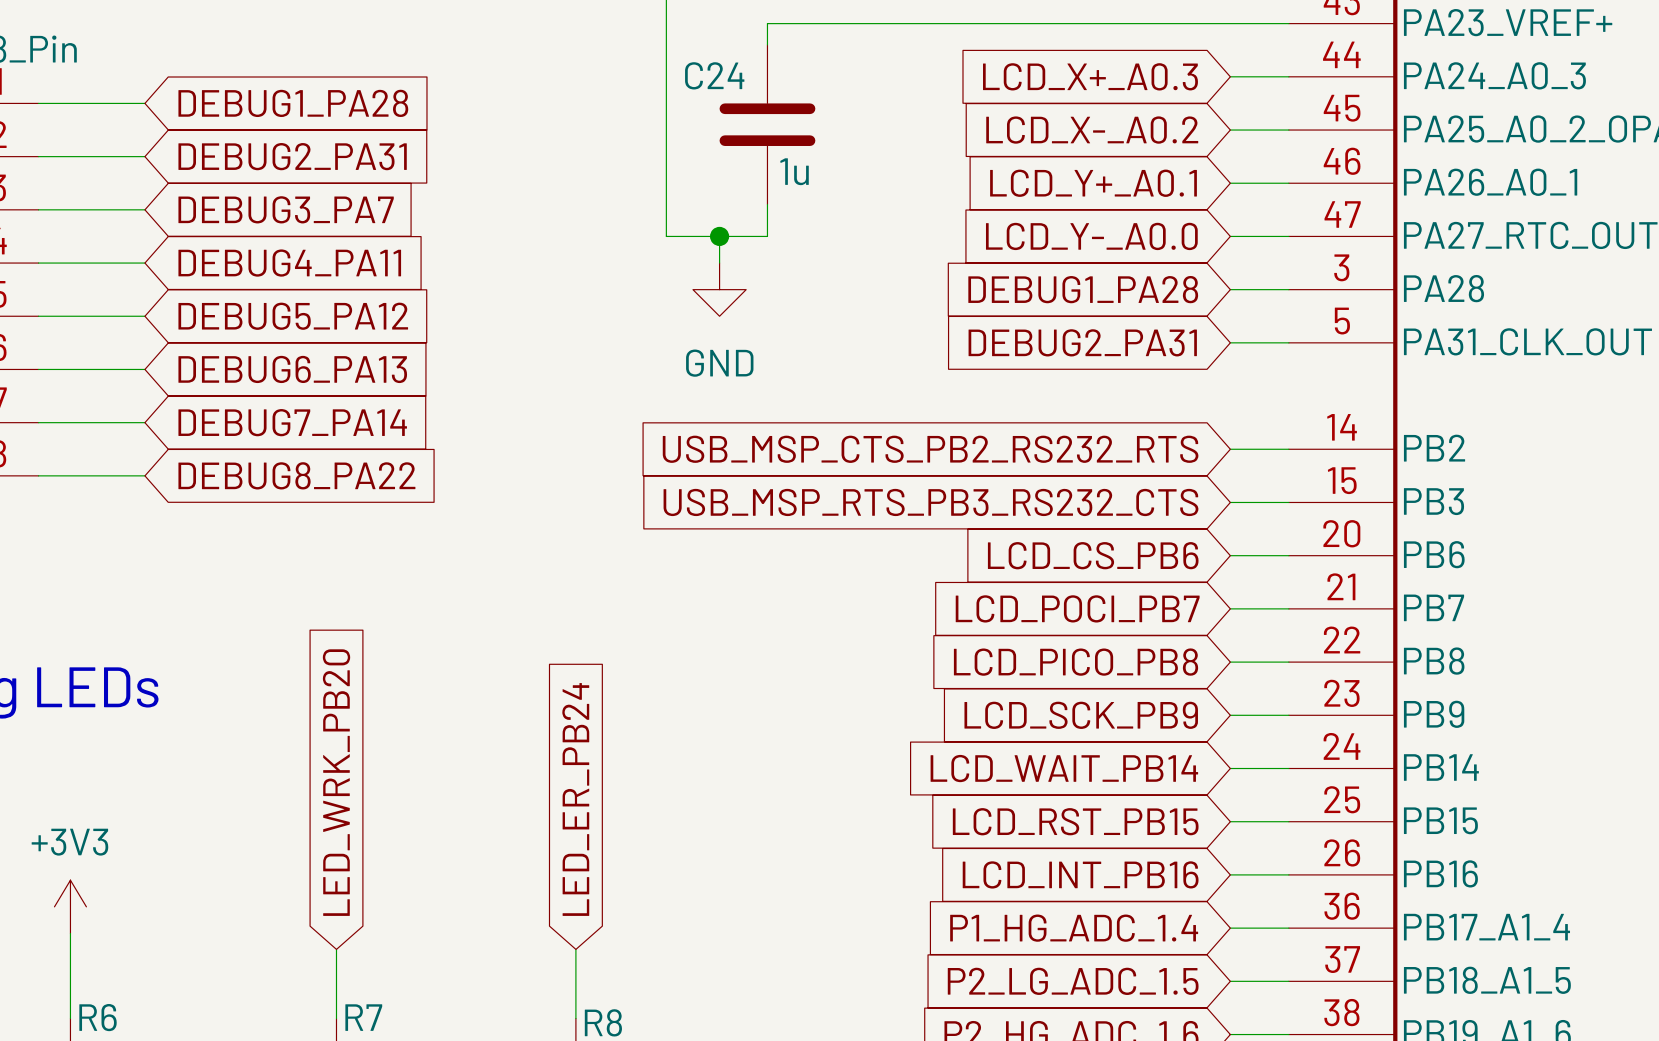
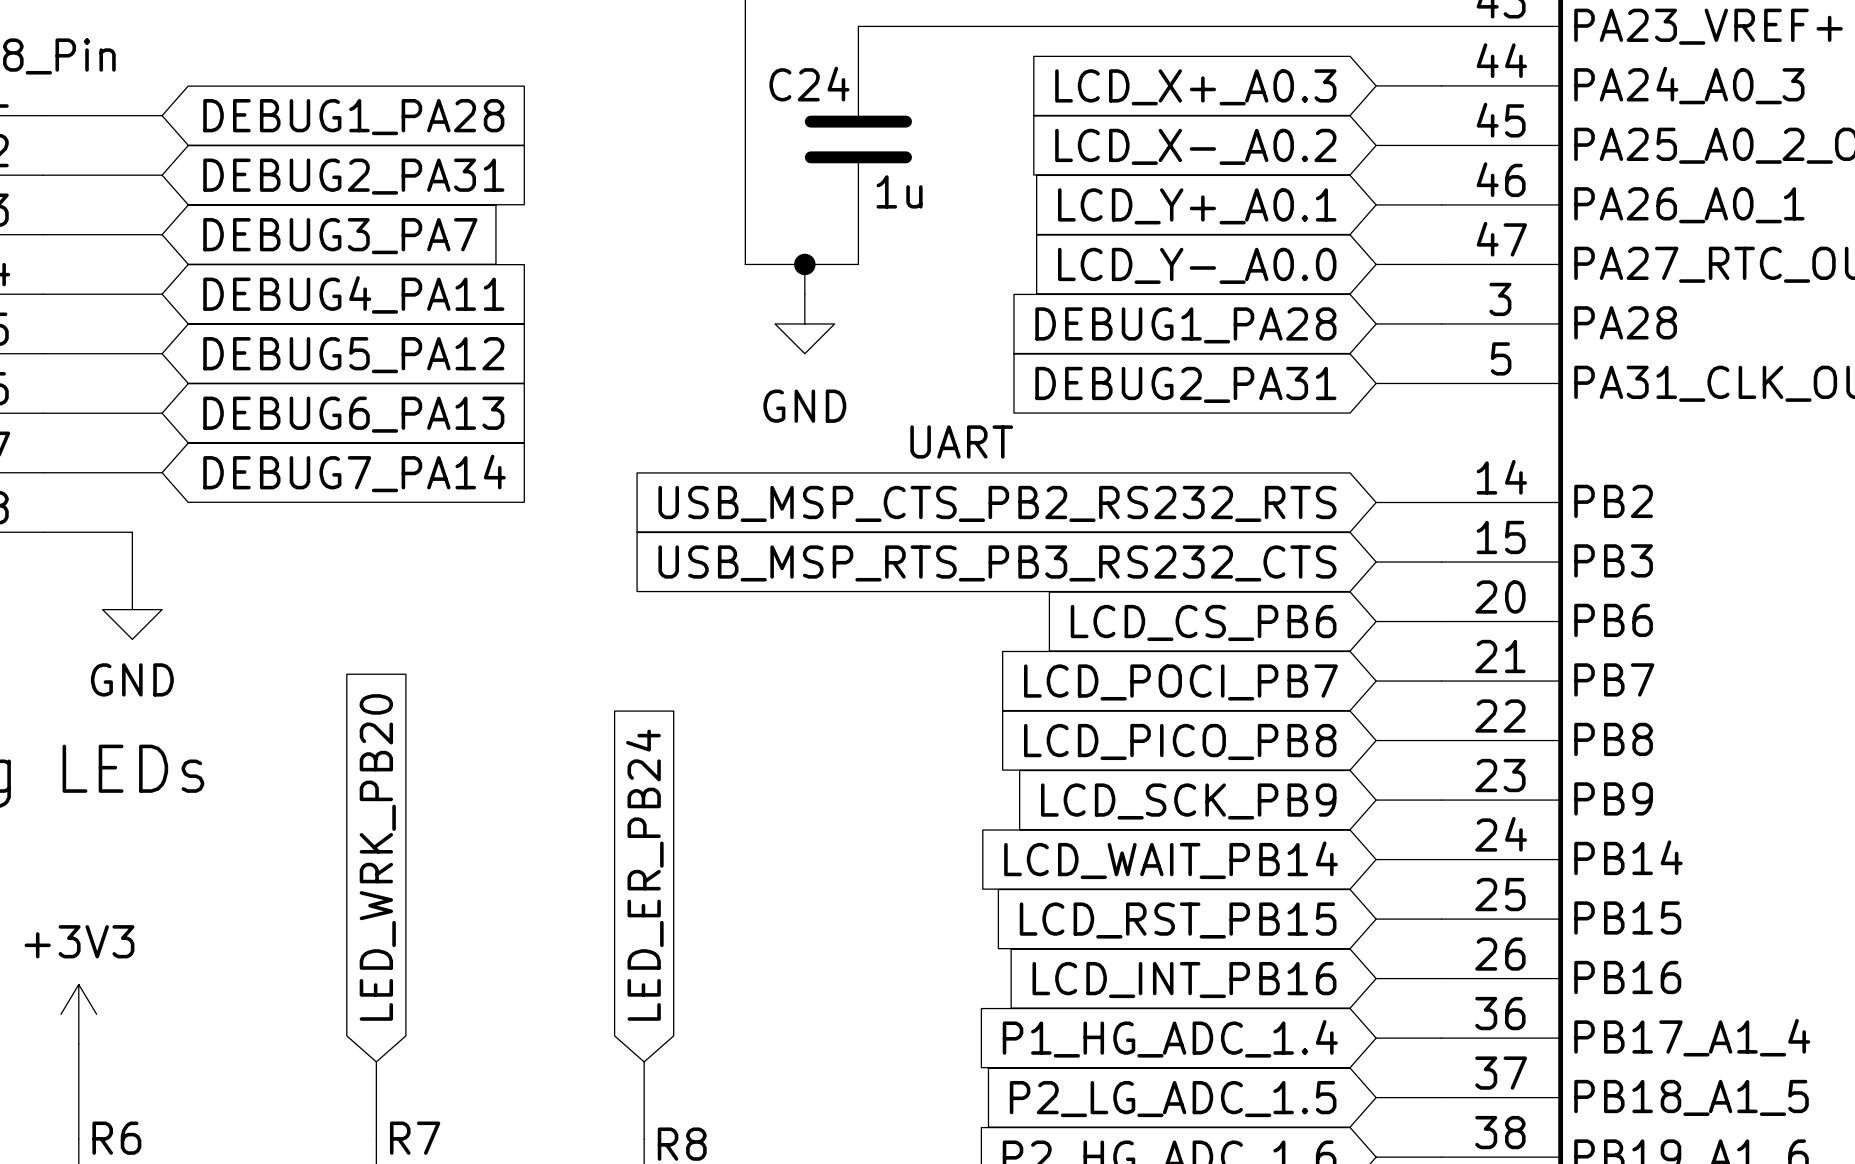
text: none -> UART (961, 441)
wire: (118, 475) (144, 475) -> (132, 532) (132, 579)
global label: DEBUG8_PA22 (296, 475) -> none
power symbol: none -> GND (132, 609)

